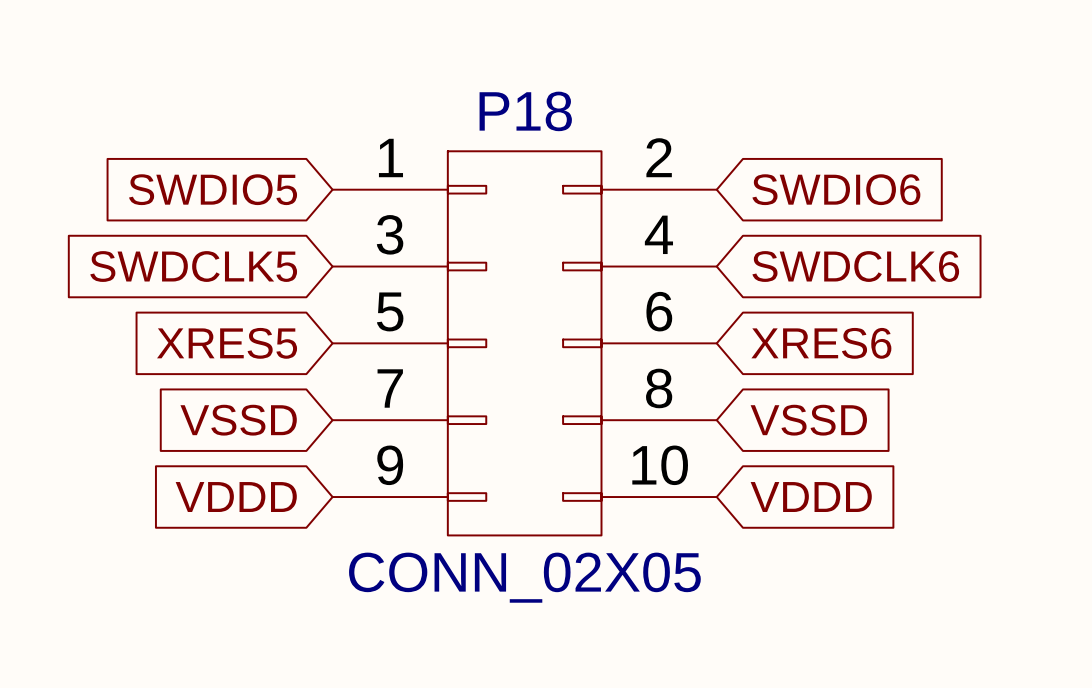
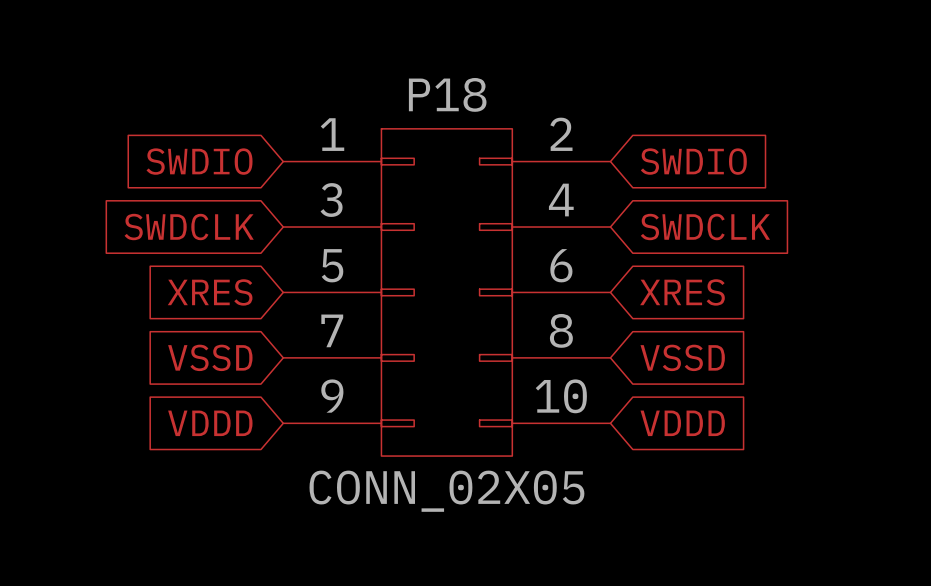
global label: SWDIO5 (213, 189) -> SWDIO (199, 161)
global label: SWDIO6 (836, 189) -> SWDIO (693, 161)
global label: SWDCLK5 (193, 266) -> SWDCLK (189, 227)
global label: SWDCLK6 (855, 266) -> SWDCLK (705, 227)
global label: XRES5 (227, 343) -> XRES (210, 292)
global label: XRES6 (821, 343) -> XRES (682, 292)

